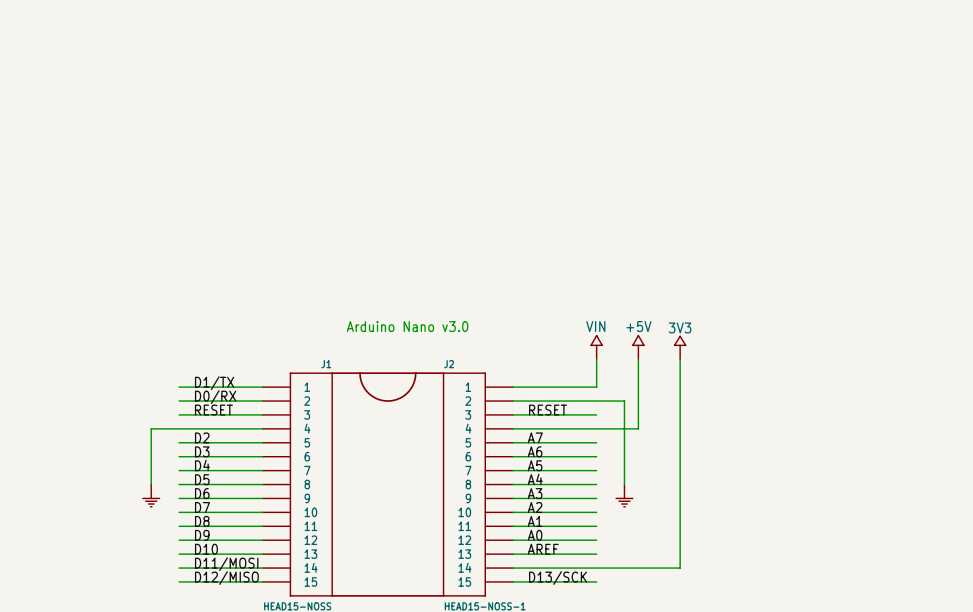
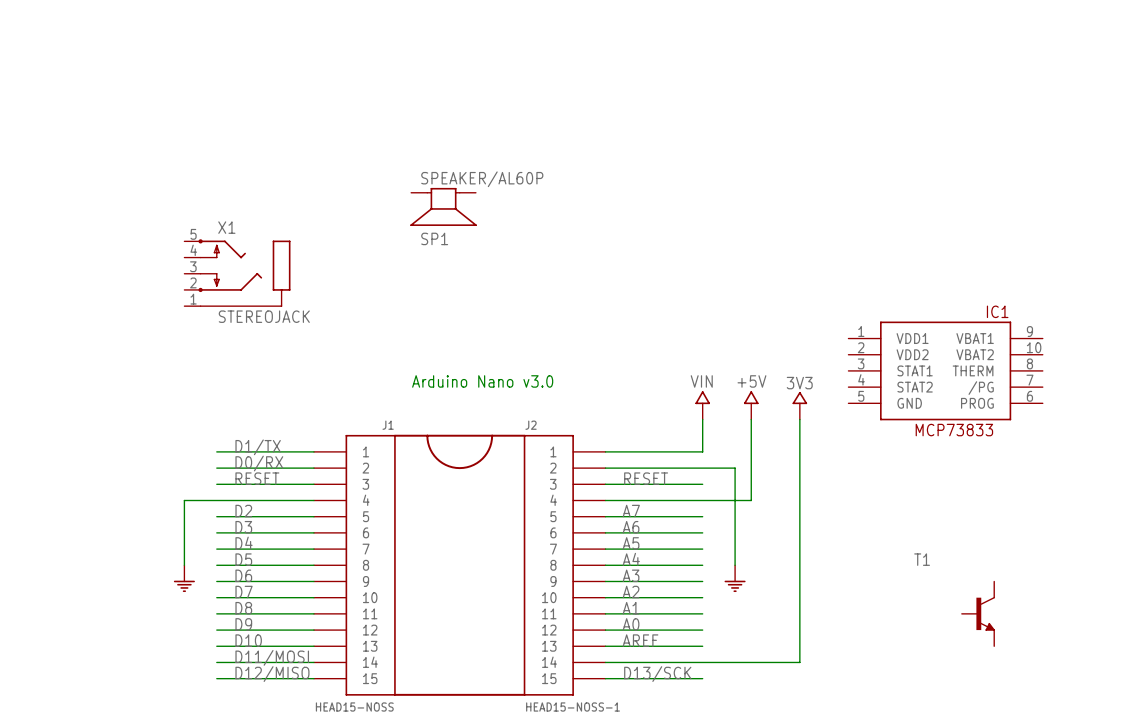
SP1: none -> SPEAKER/AL60P (443, 206)
X1: none -> STEREOJACK (237, 272)
IC1: none -> (945, 370)
T1: none -> (978, 613)

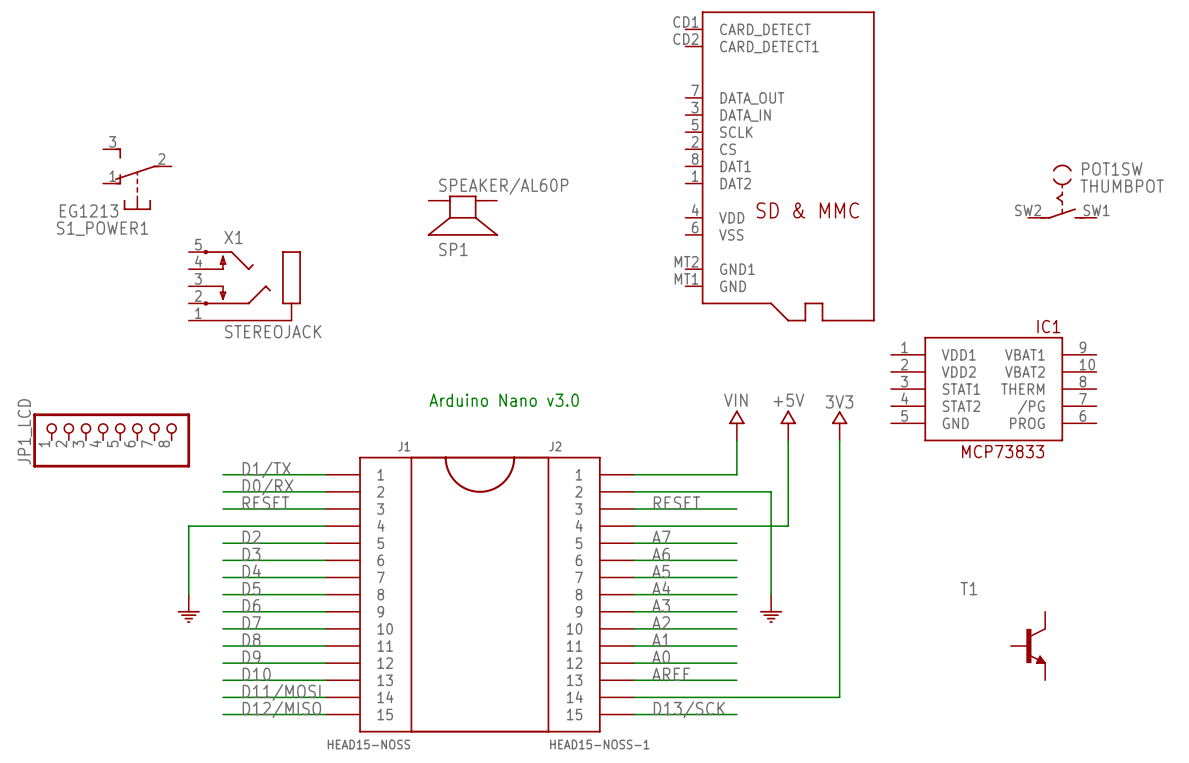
part: none -> (780, 166)
S1_POWER1: none -> EG1213 (137, 179)
POT1SW: none -> THUMBPOT (1062, 191)
JP1_LCD: none -> (111, 440)

